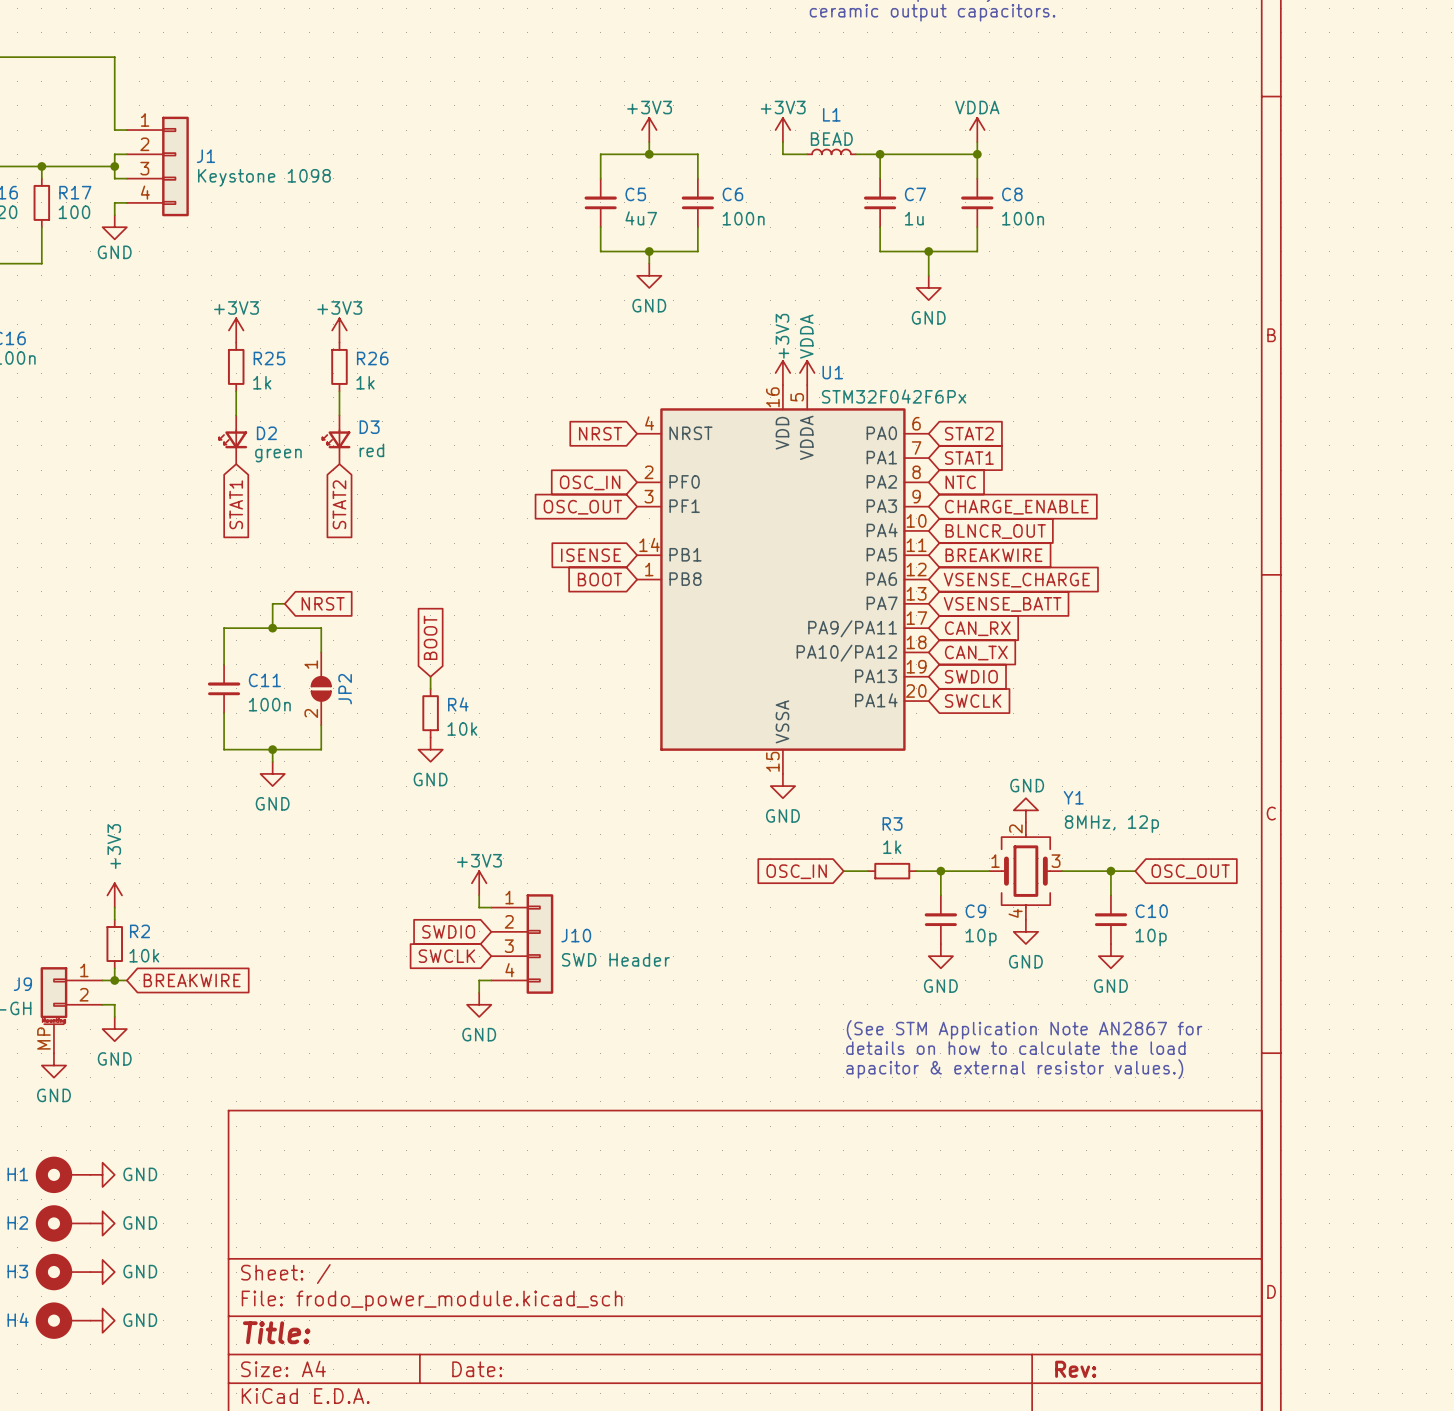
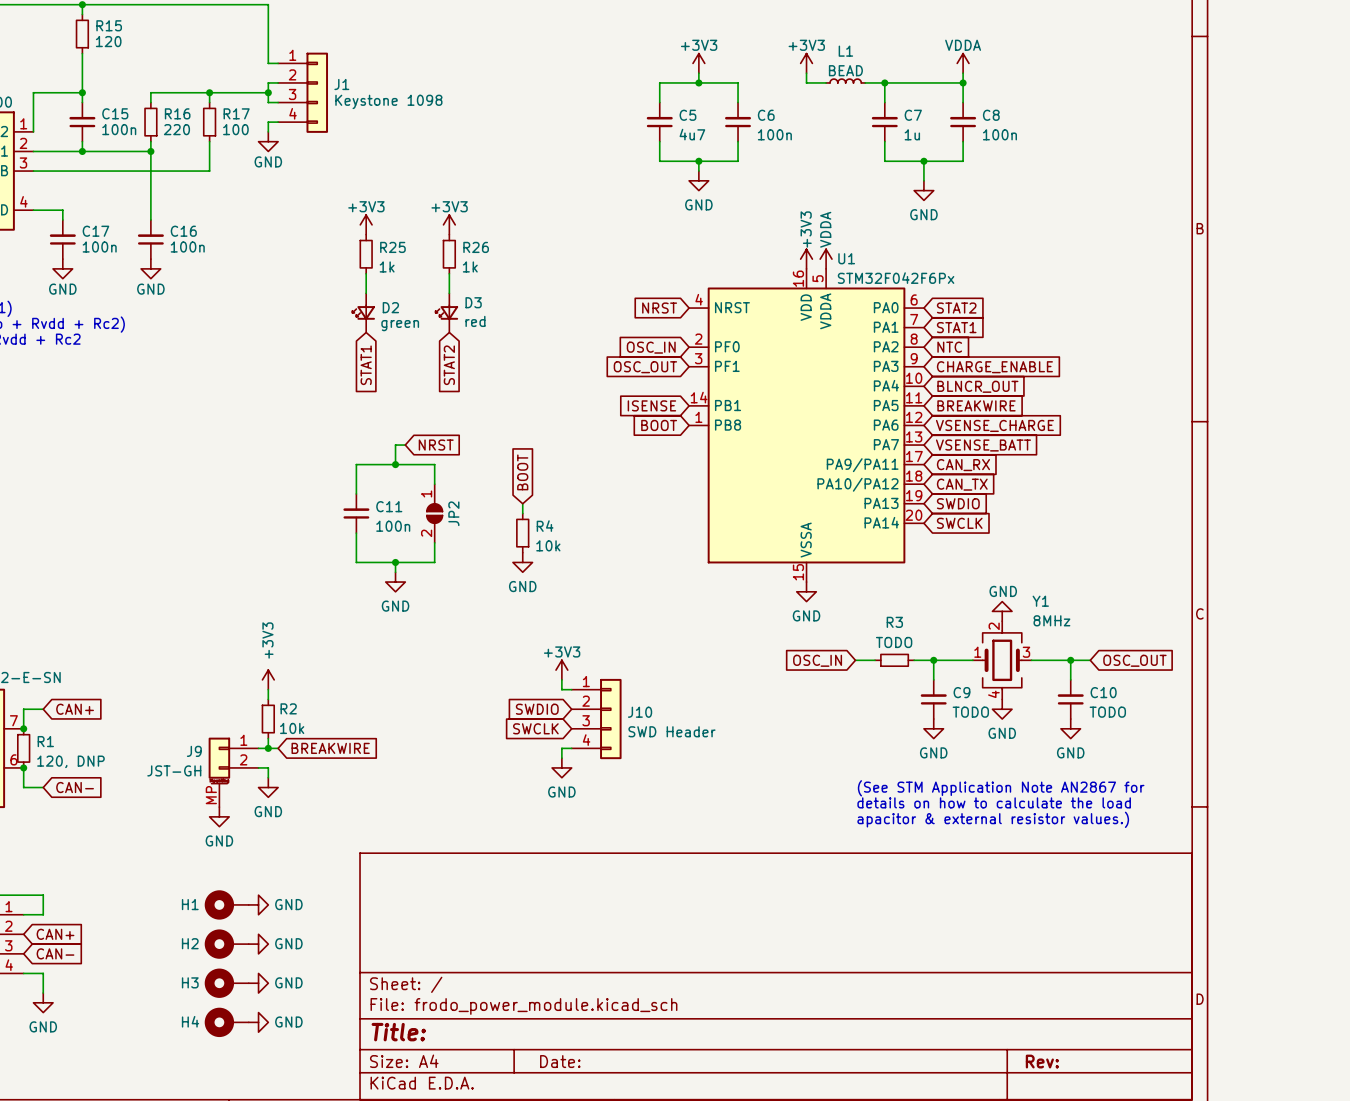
Y1 value: 8MHz, 12p (1111, 824) -> 8MHz (1051, 620)
R3 value: 1k (892, 847) -> TODO (894, 642)
C9 value: 10p (981, 937) -> TODO (970, 712)
C10 value: 10p (1151, 937) -> TODO (1107, 712)

